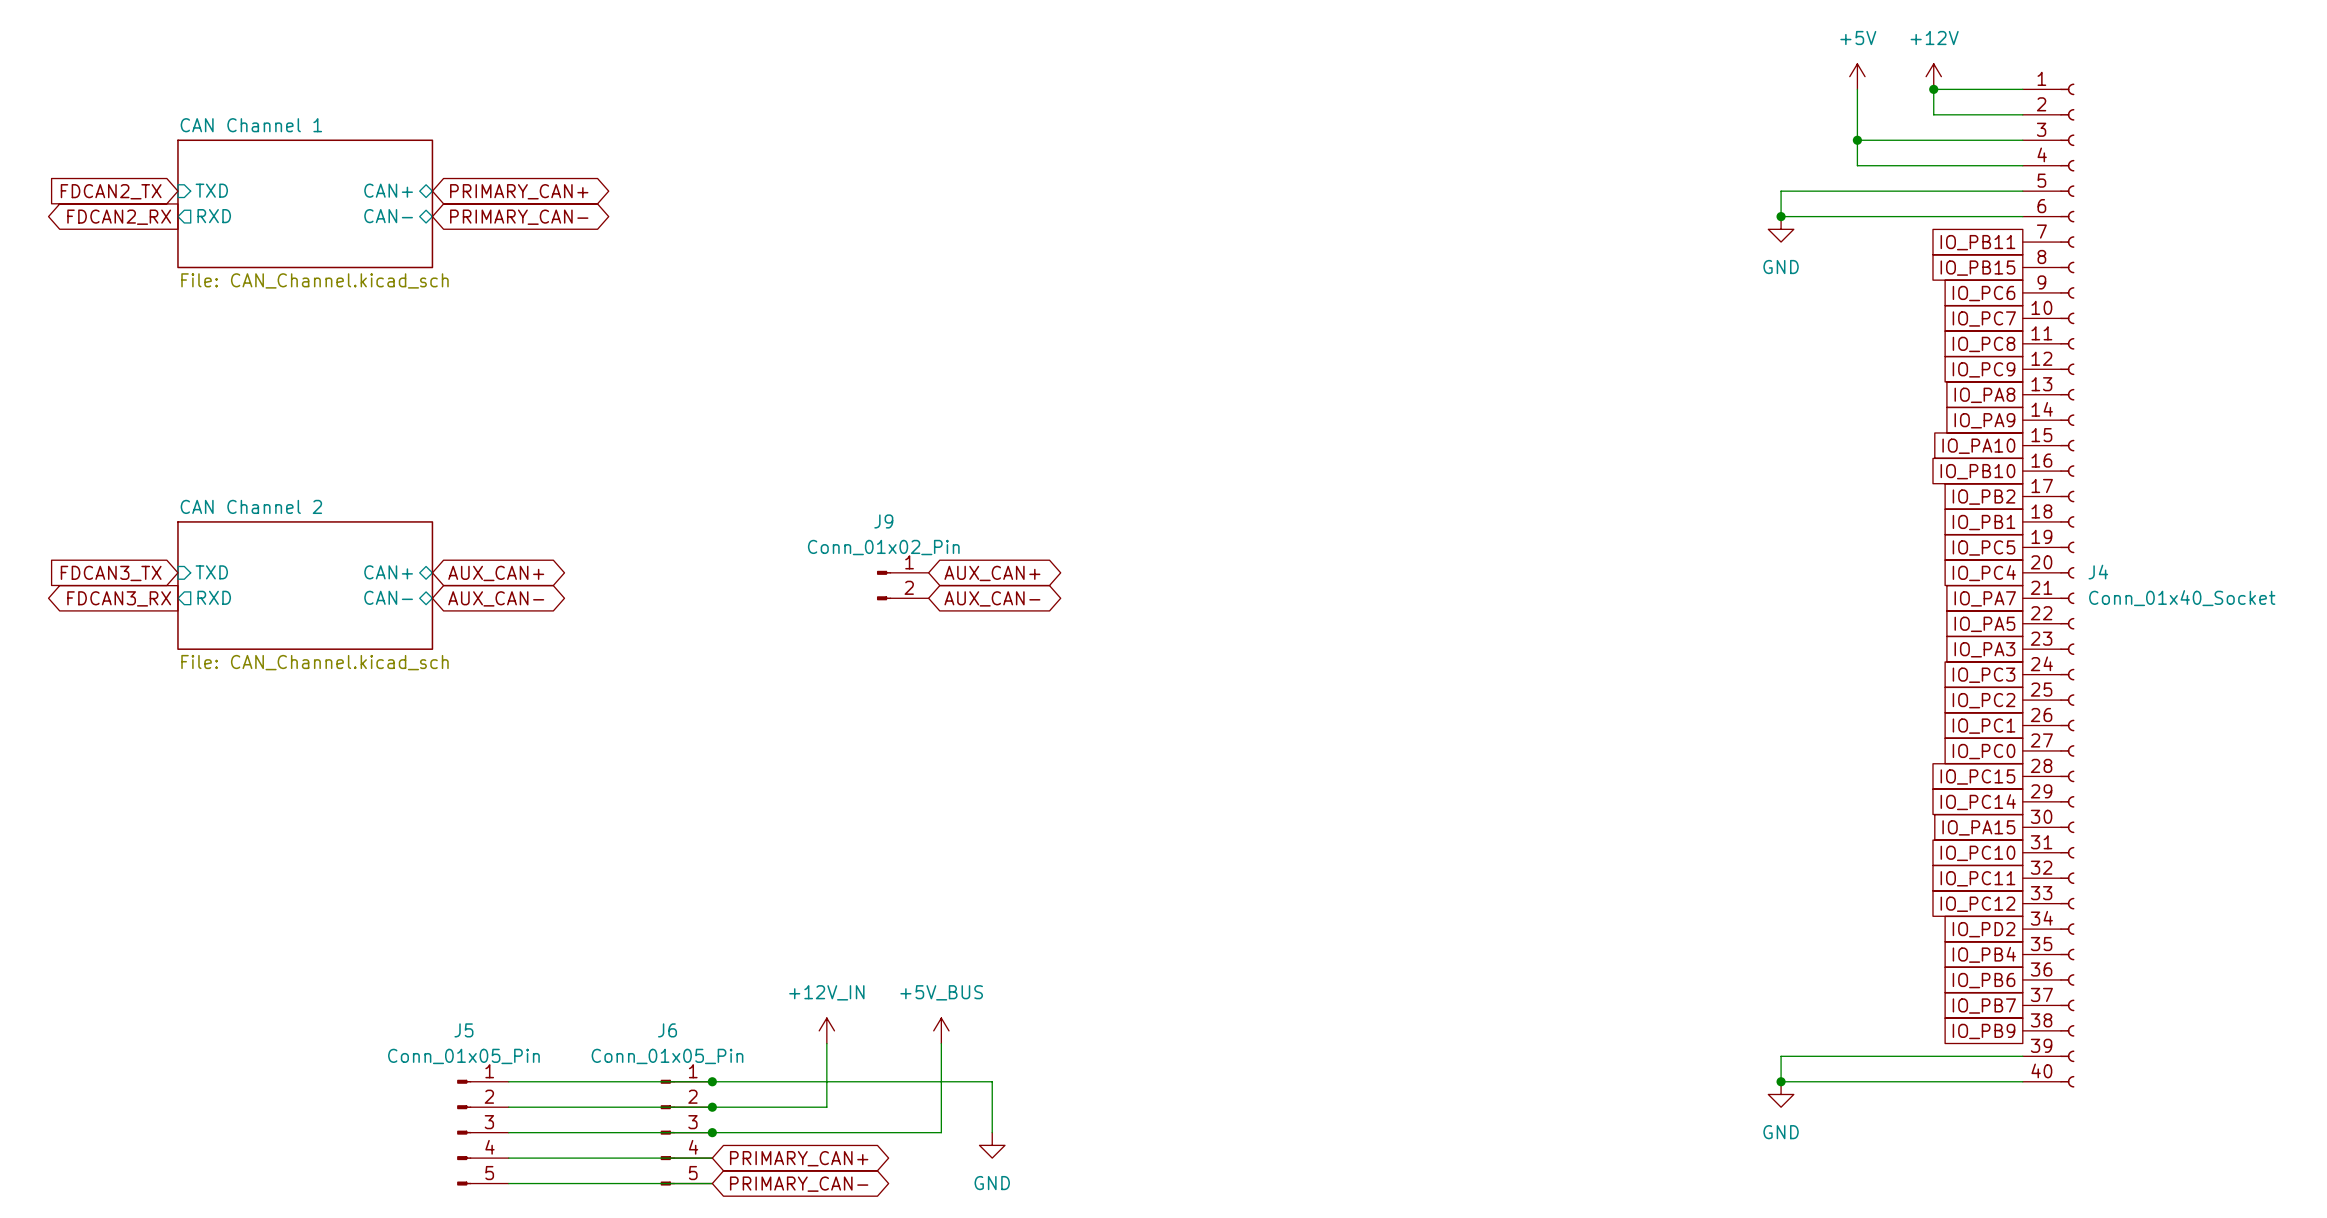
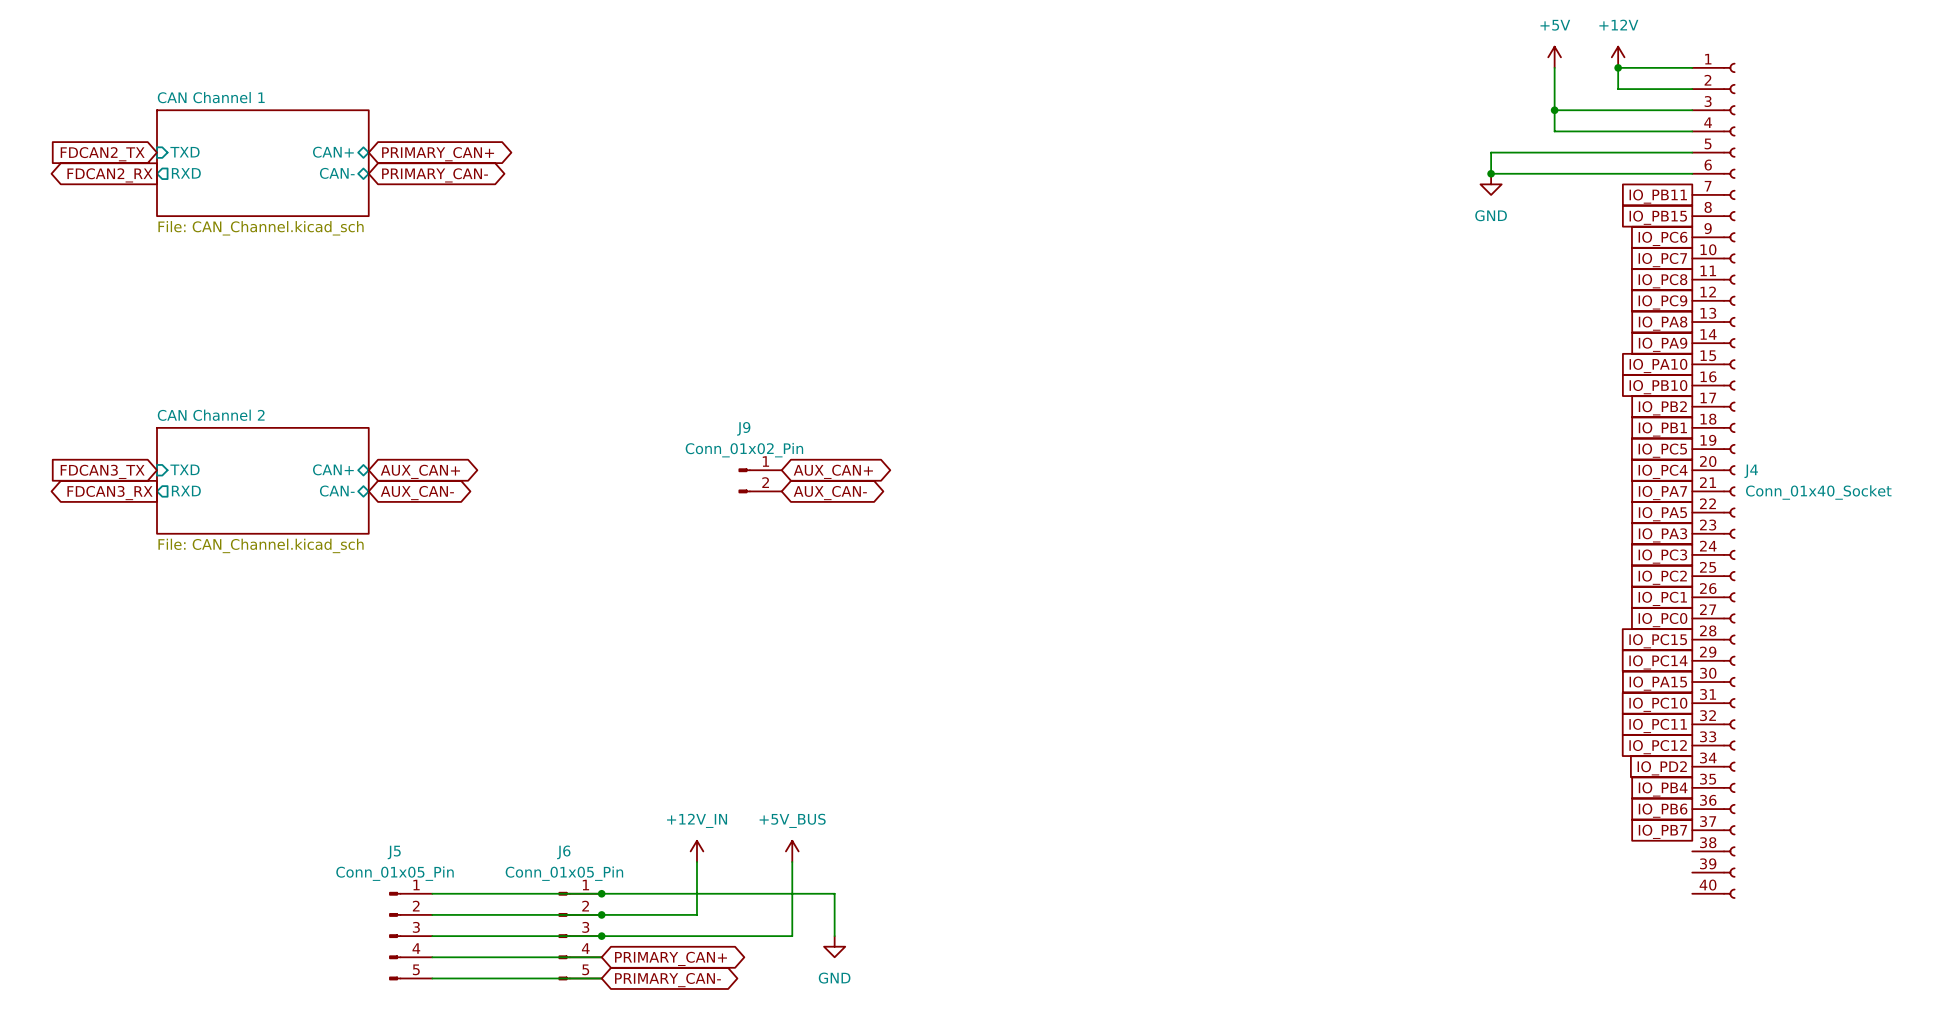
global label: IO_PB9 (1984, 1031) -> none
wire: (2022, 1056) (1781, 1056) (1781, 1081) (2022, 1081) -> none
junction: (1781, 1081) -> none
power symbol: GND (1781, 1094) -> none

